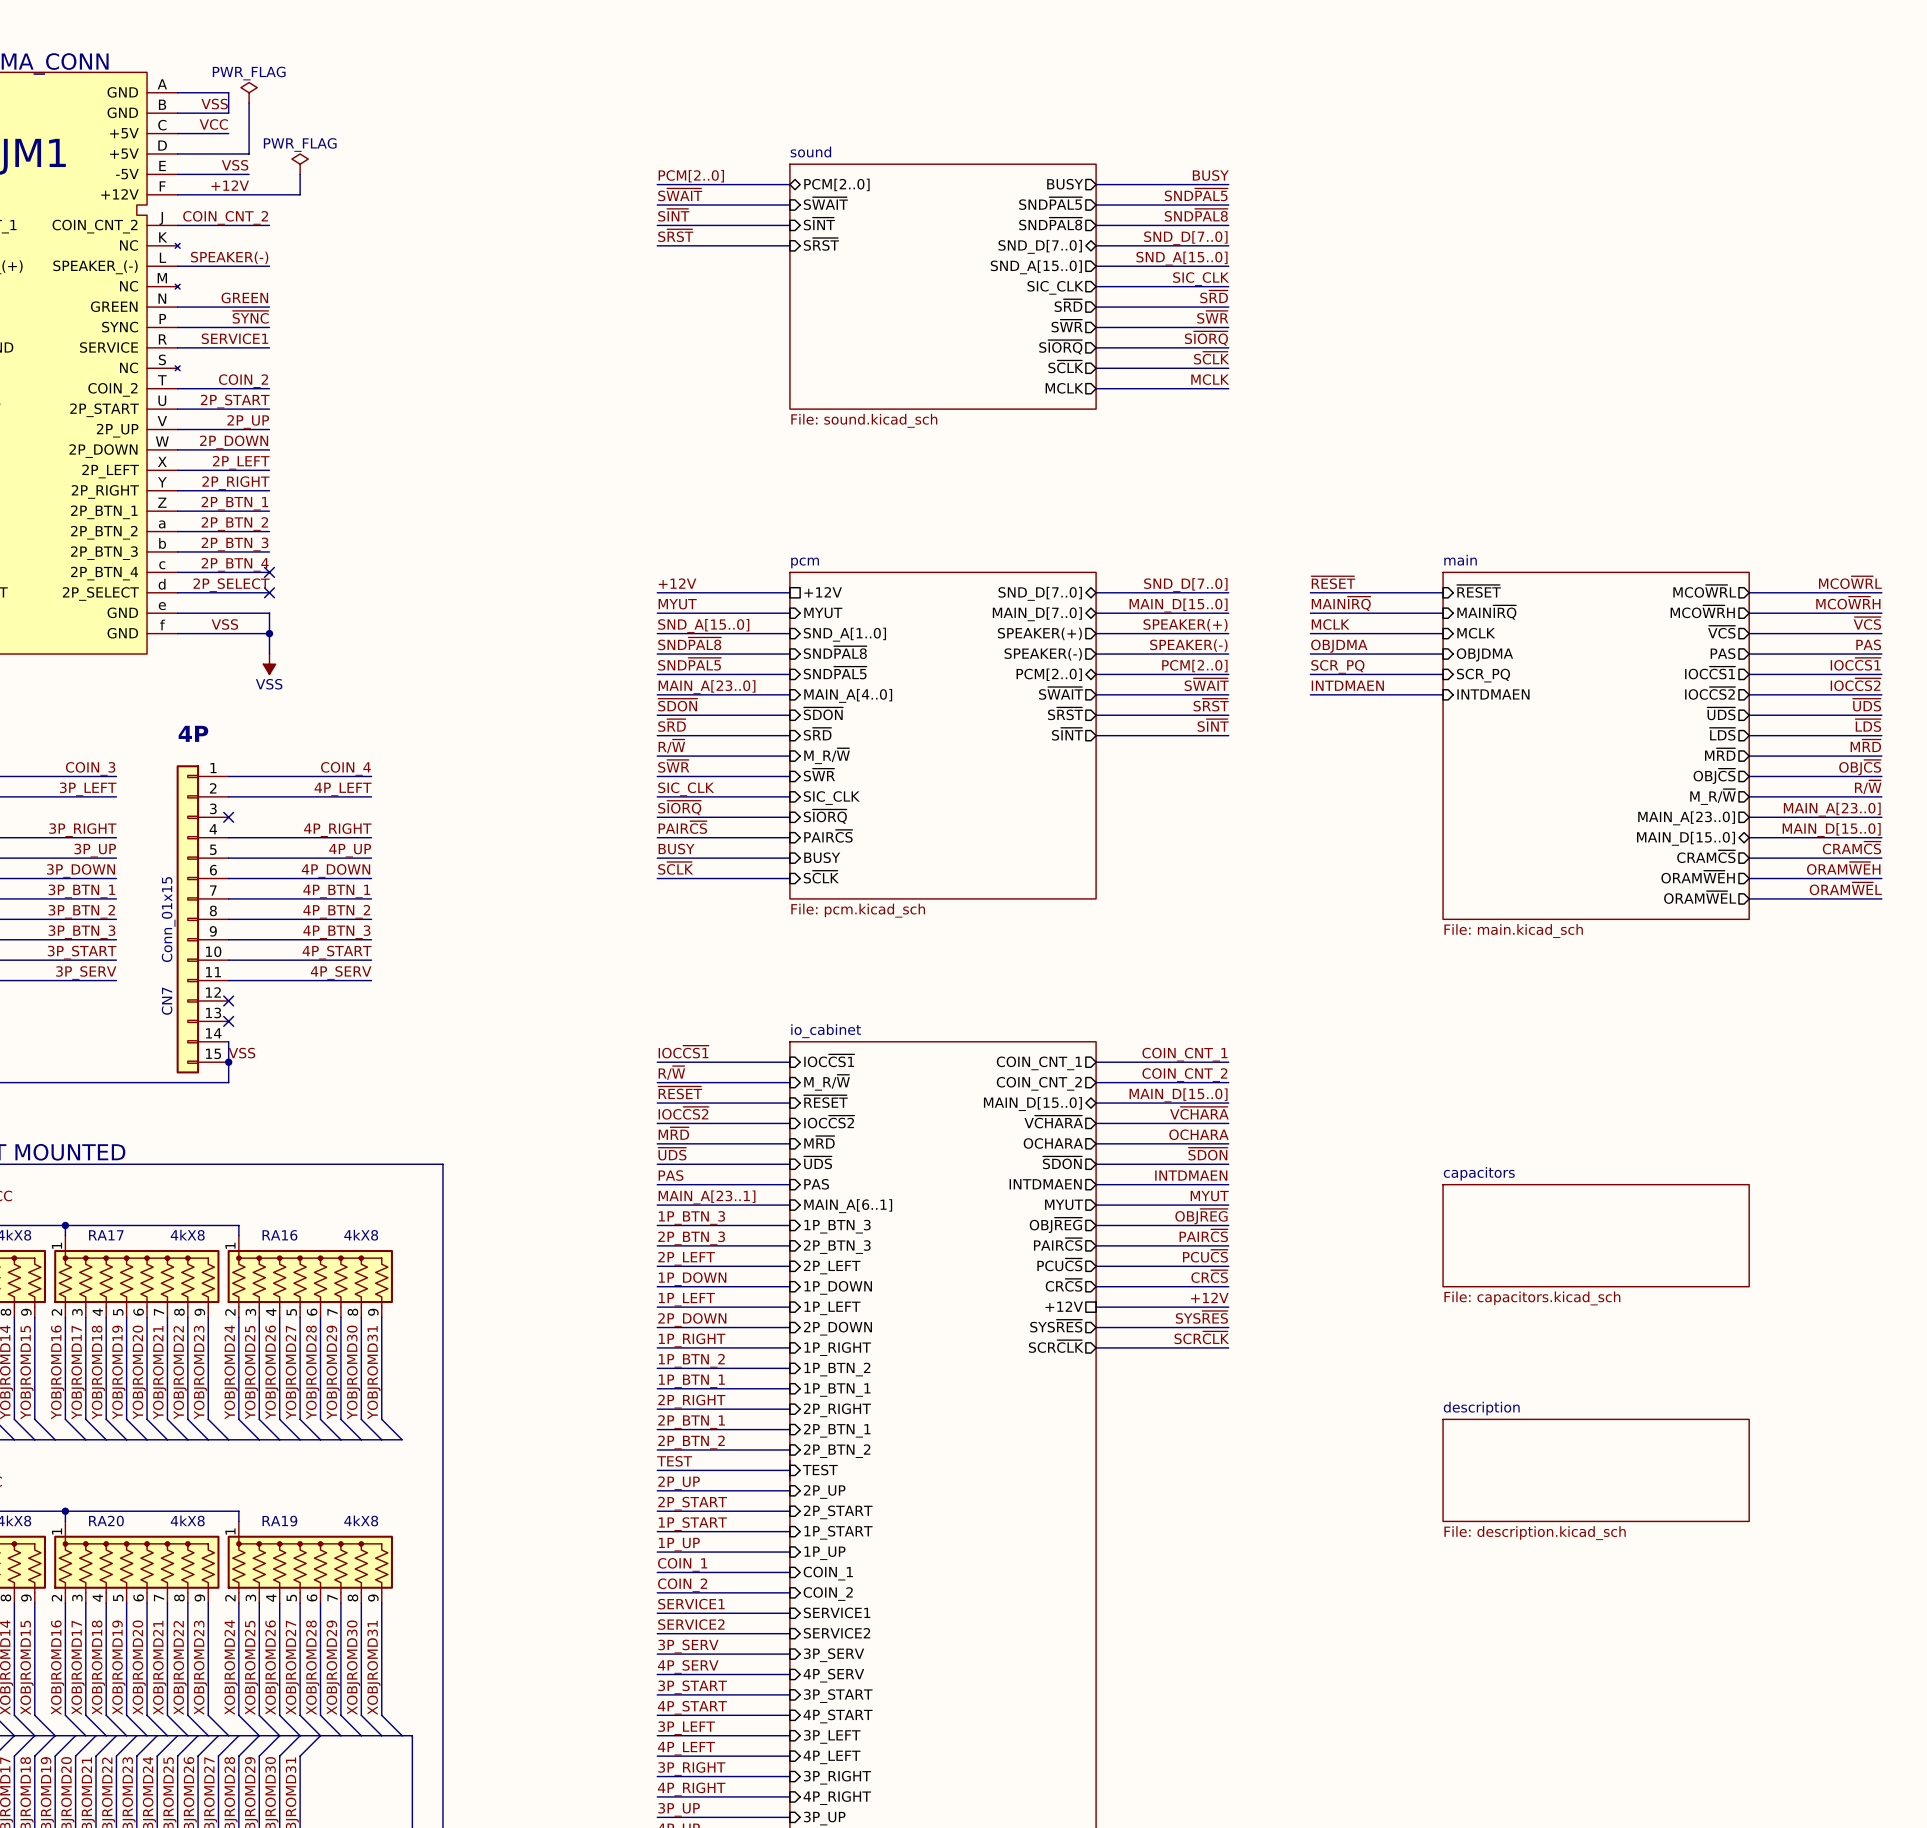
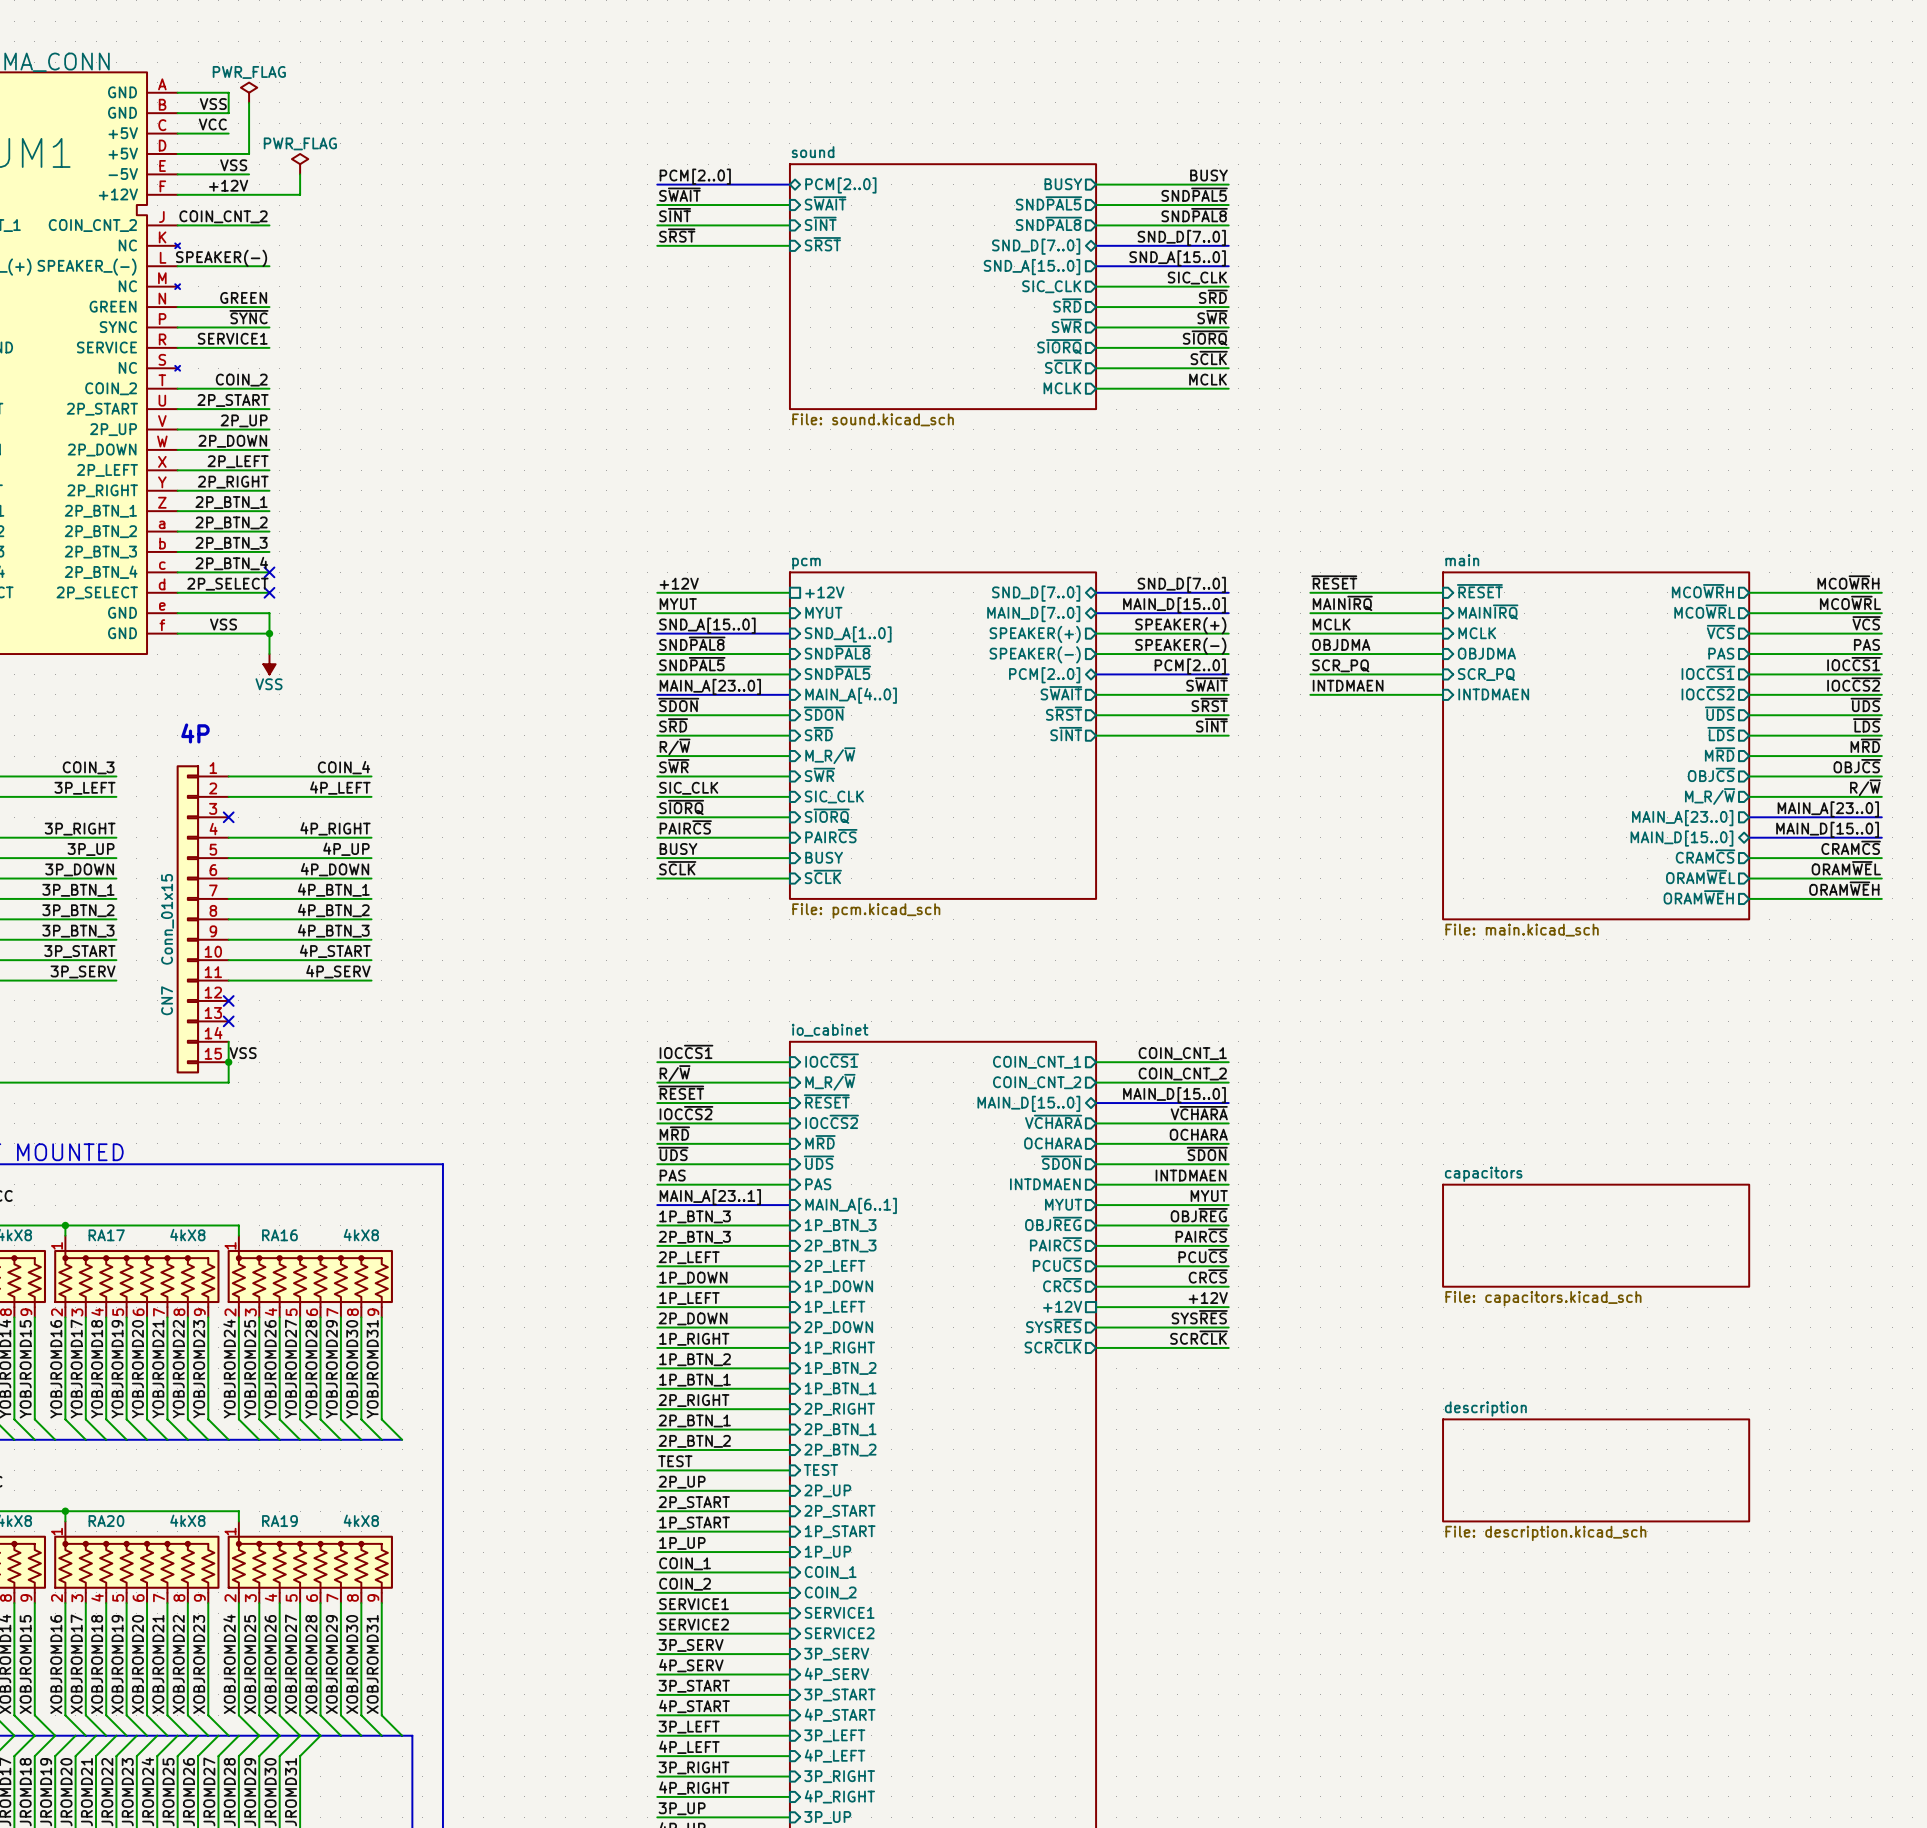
label: MCO~{WR}L (1850, 582) -> MCO~{WR}H (1848, 582)
sheet pin: MCO~{WR}L (1704, 591) -> MCO~{WR}H (1702, 591)
label: MCO~{WR}H (1848, 603) -> MCO~{WR}L (1850, 602)
sheet pin: MCO~{WR}H (1702, 611) -> MCO~{WR}L (1704, 611)
label: ORAM~{WE}H (1843, 868) -> ORAM~{WE}L (1846, 868)
sheet pin: ORAM~{WE}H (1698, 877) -> ORAM~{WE}L (1700, 876)
label: ORAM~{WE}L (1845, 888) -> ORAM~{WE}H (1844, 888)
sheet pin: ORAM~{WE}L (1700, 897) -> ORAM~{WE}H (1698, 897)

